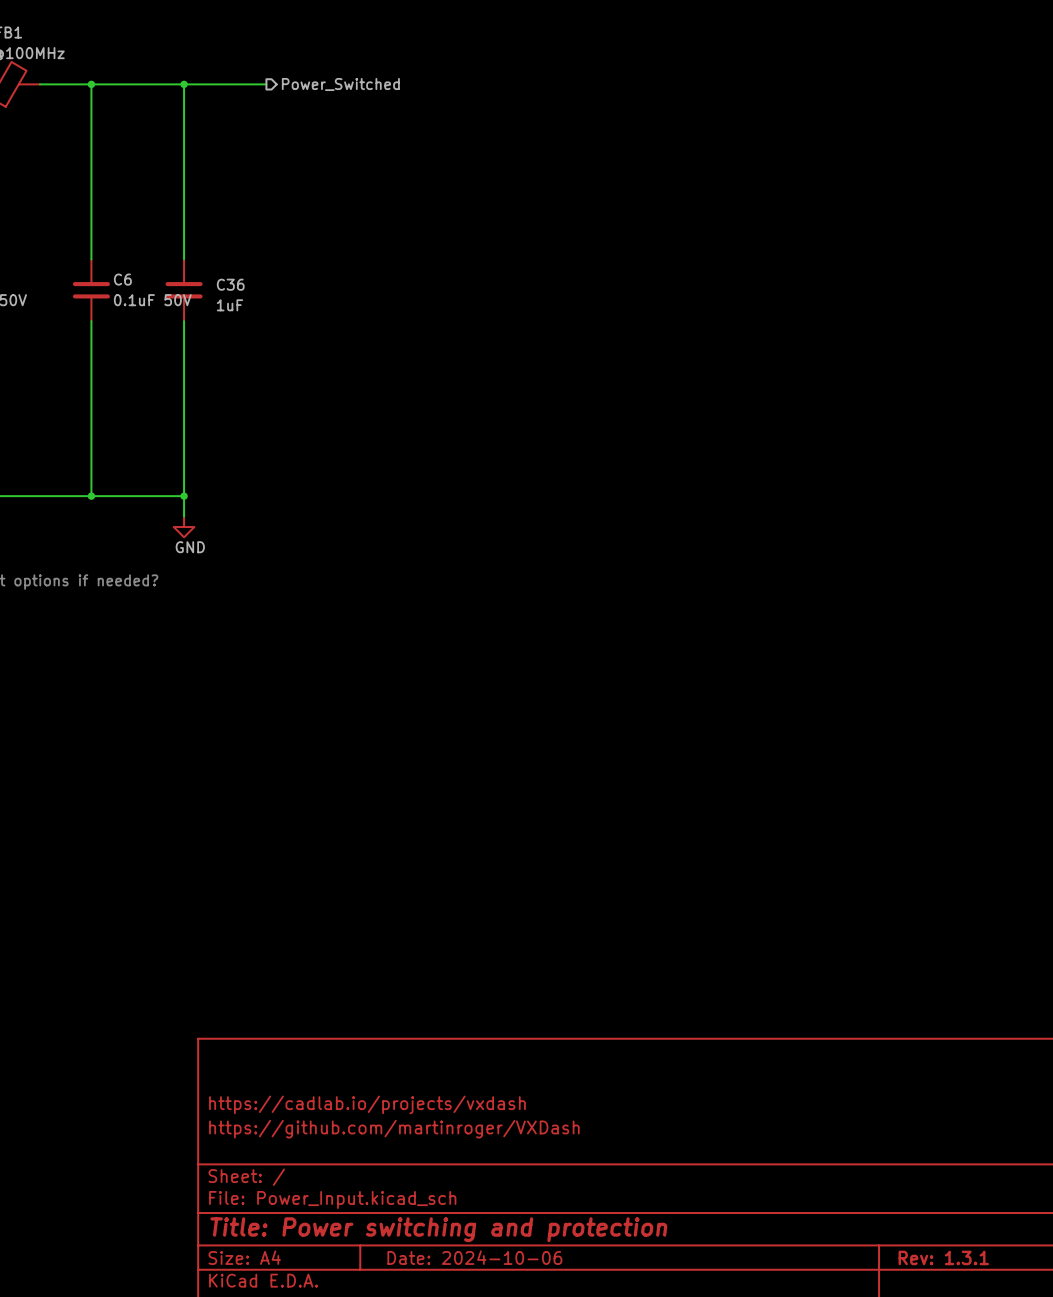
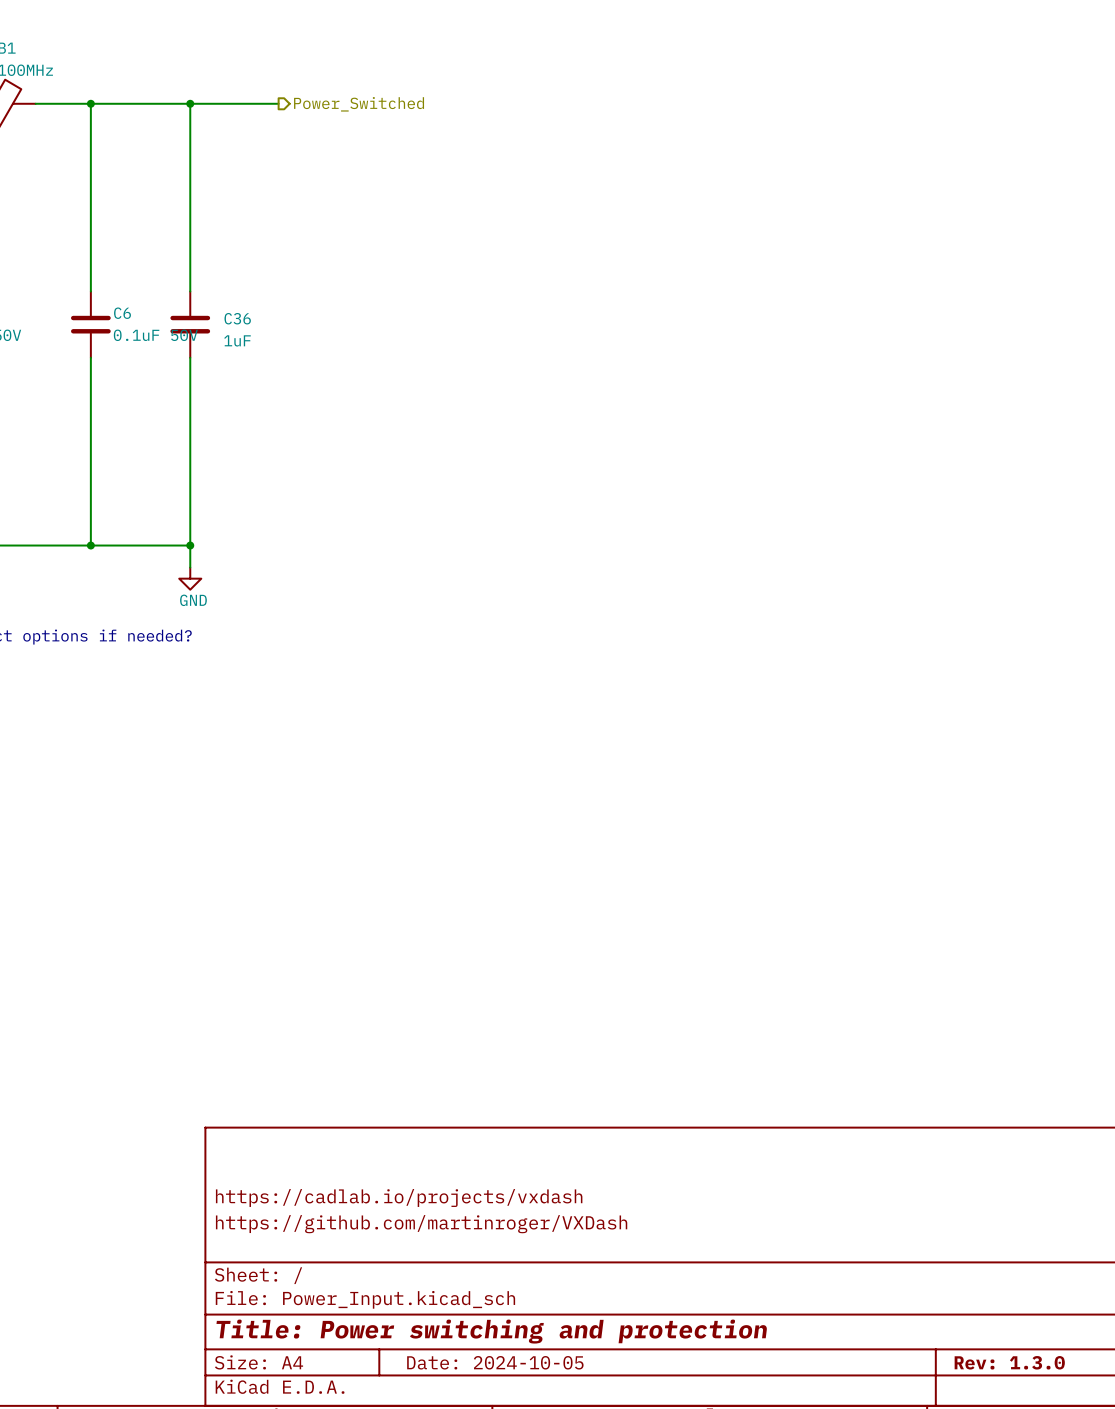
title block: Date: 2024-10-06 (474, 1257) -> Date: 2024-10-05 (495, 1362)
title block: Rev: 1.3.1 (943, 1257) -> Rev: 1.3.0 (1009, 1362)

